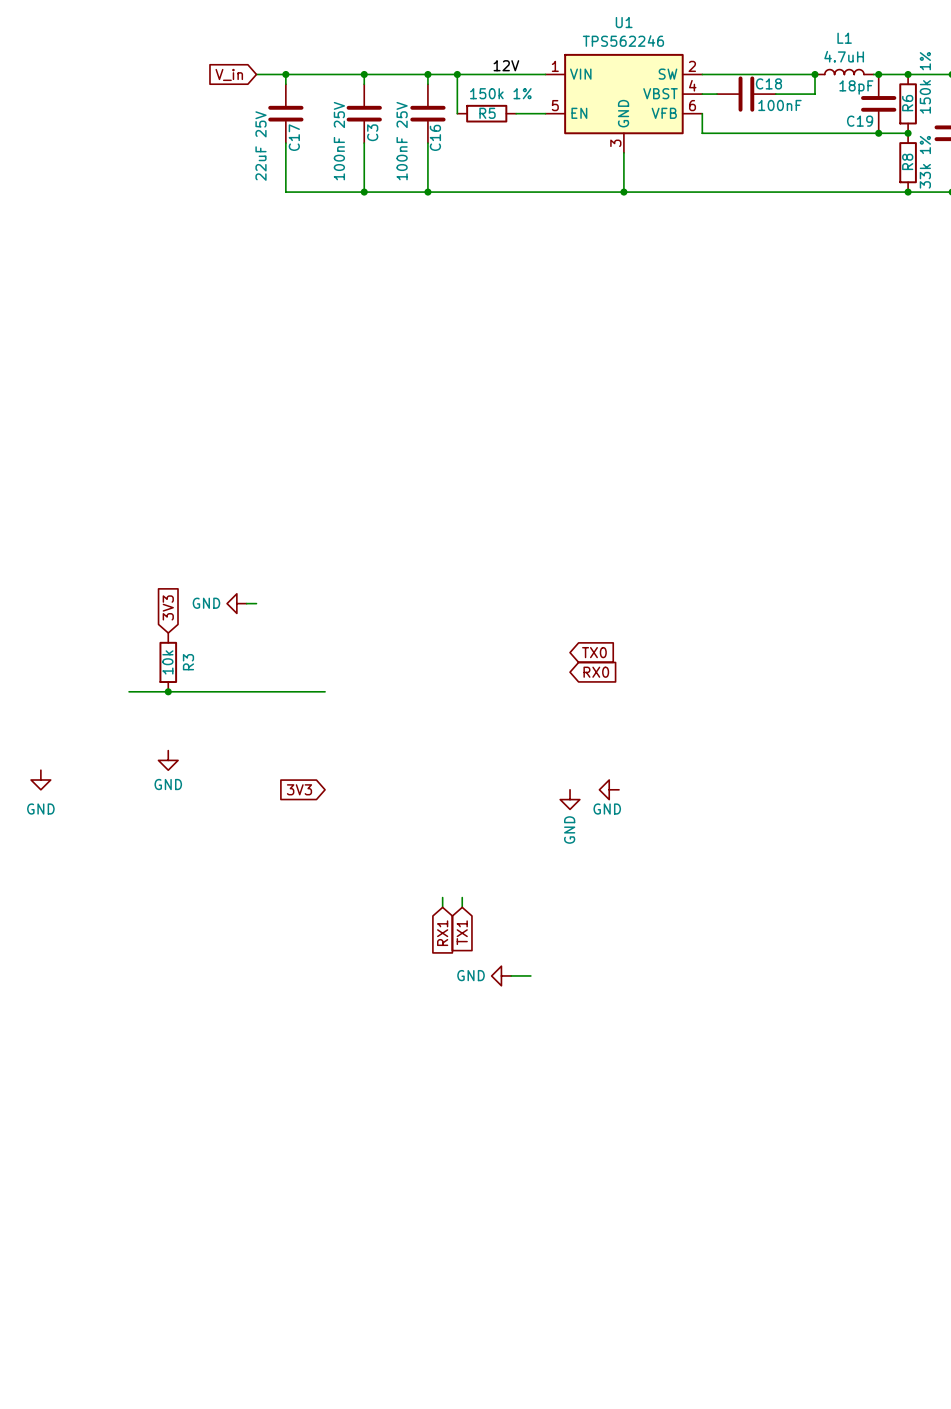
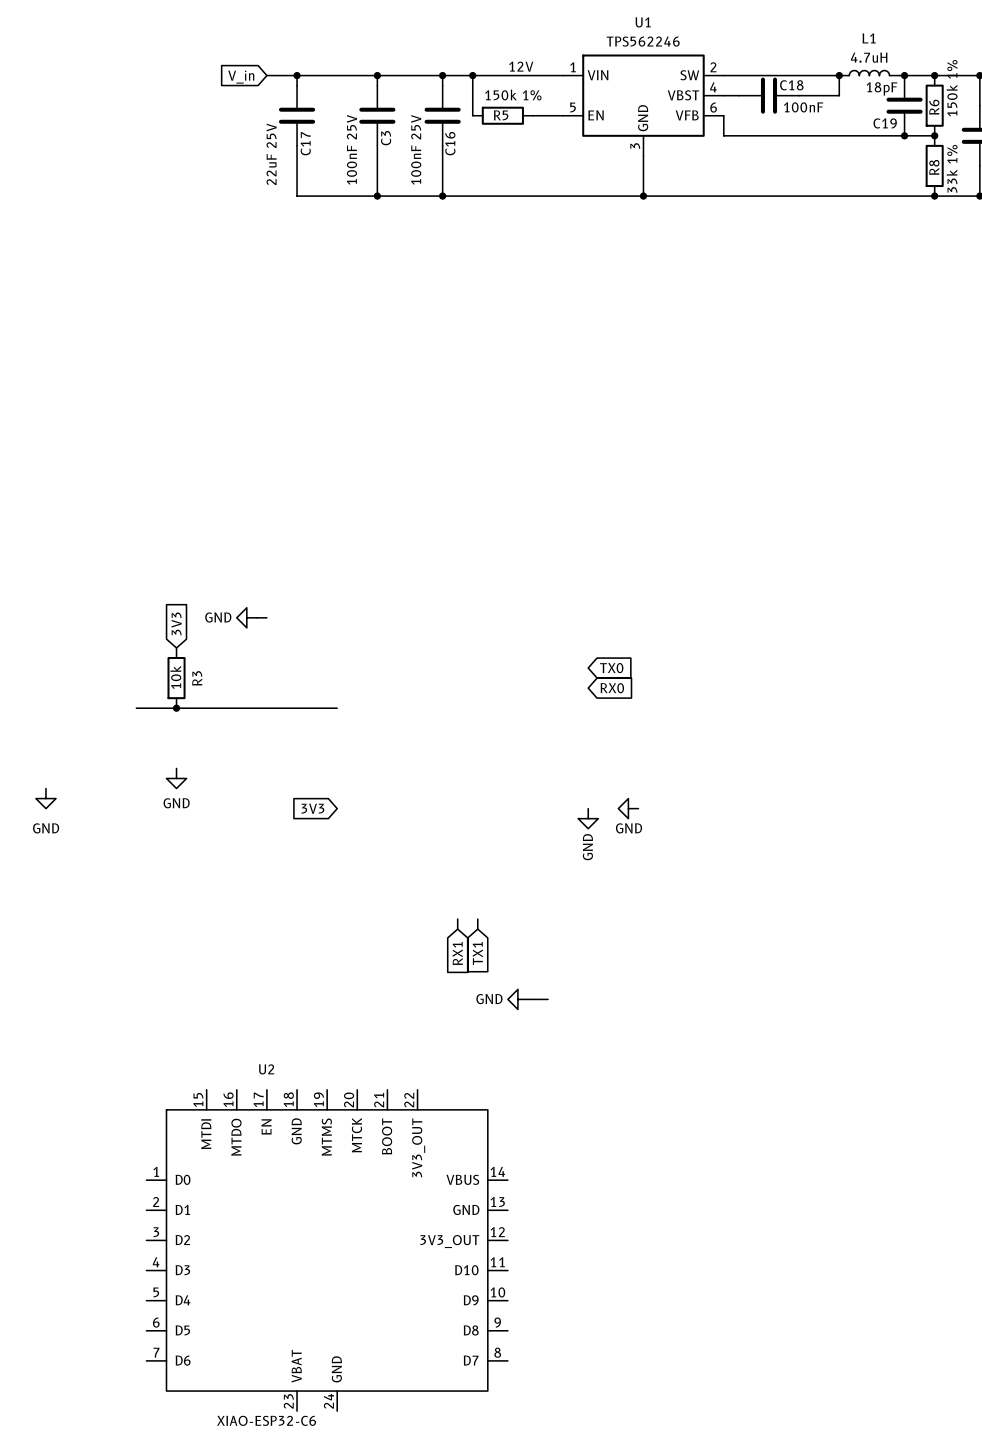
U2: none -> XIAO-ESP32-C6 (327, 1250)

